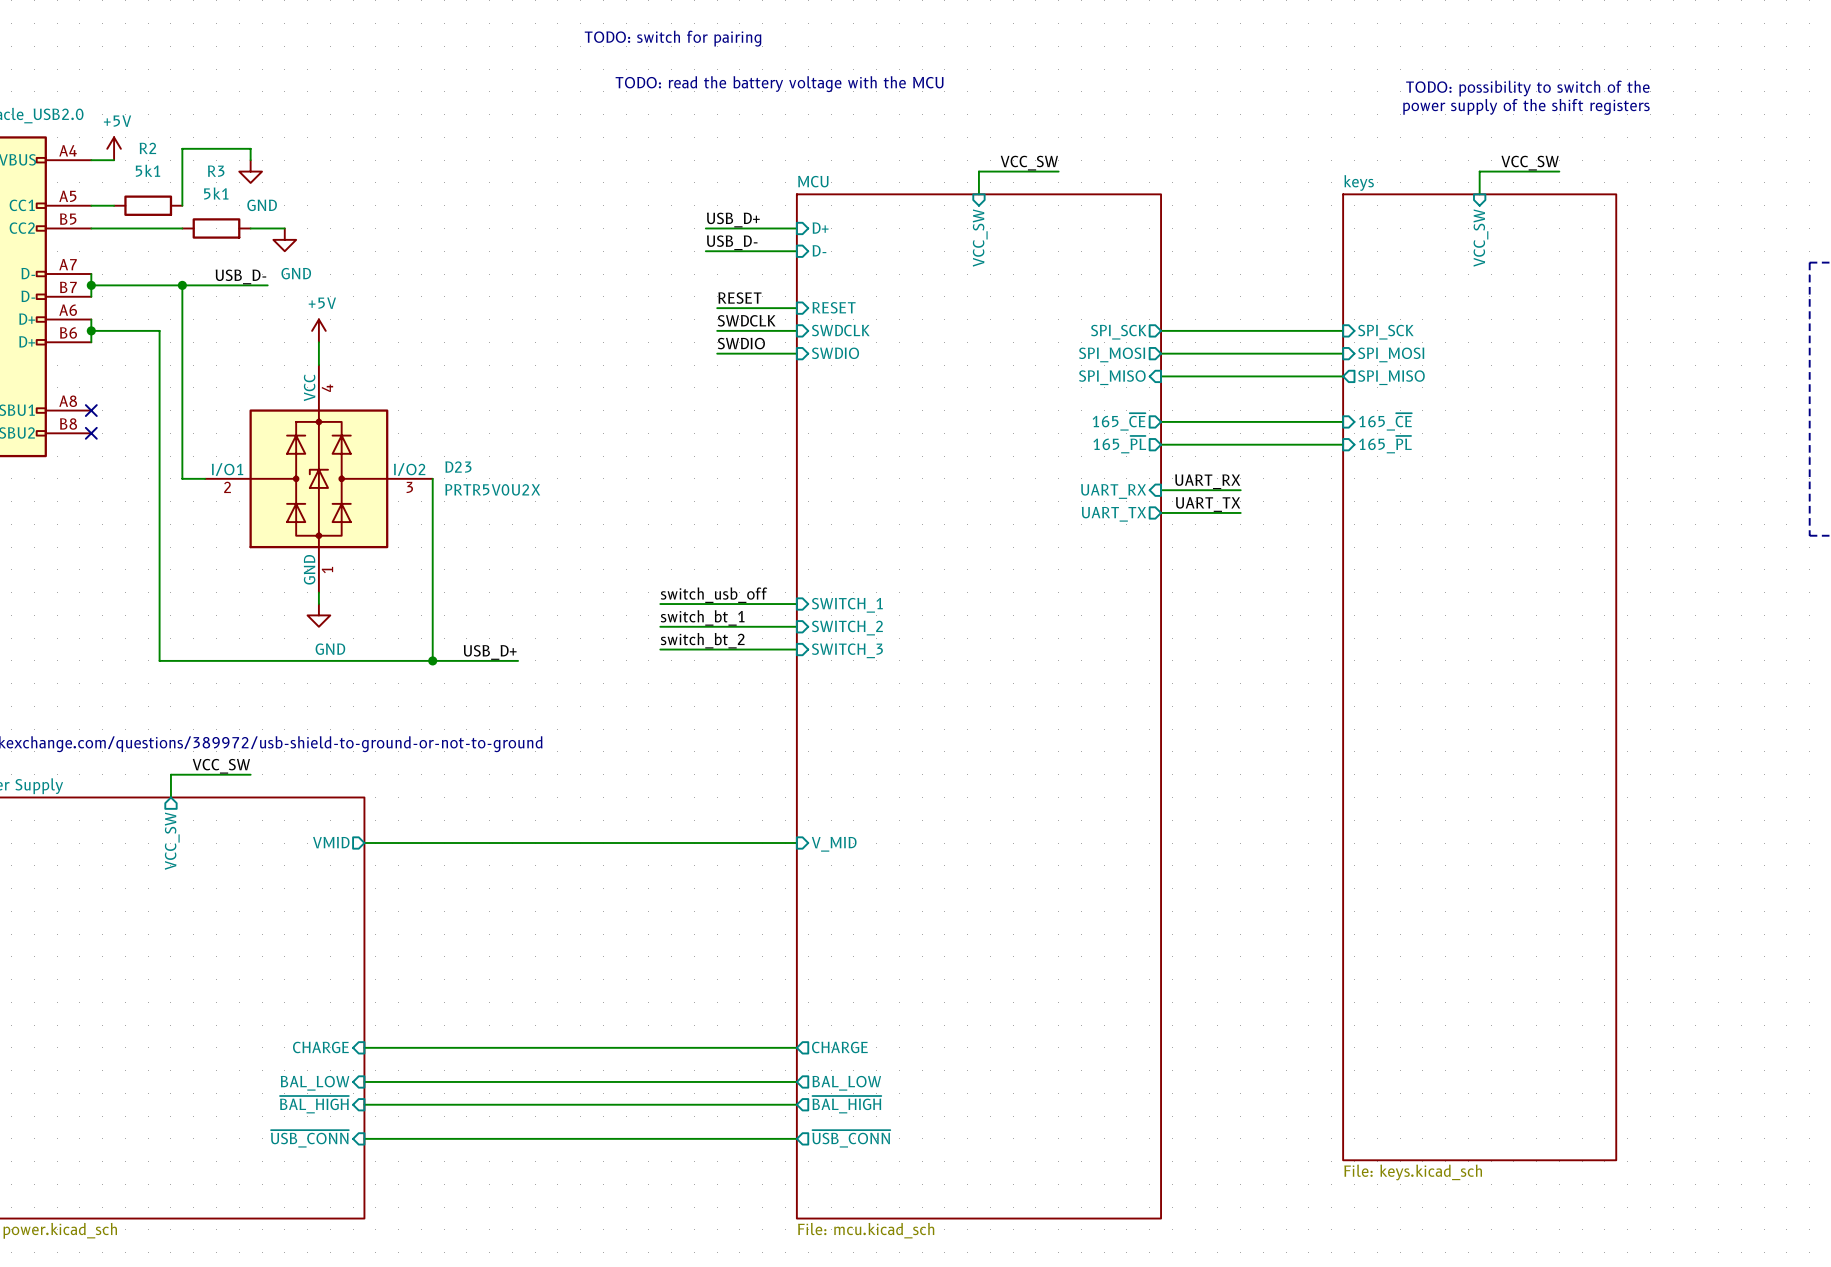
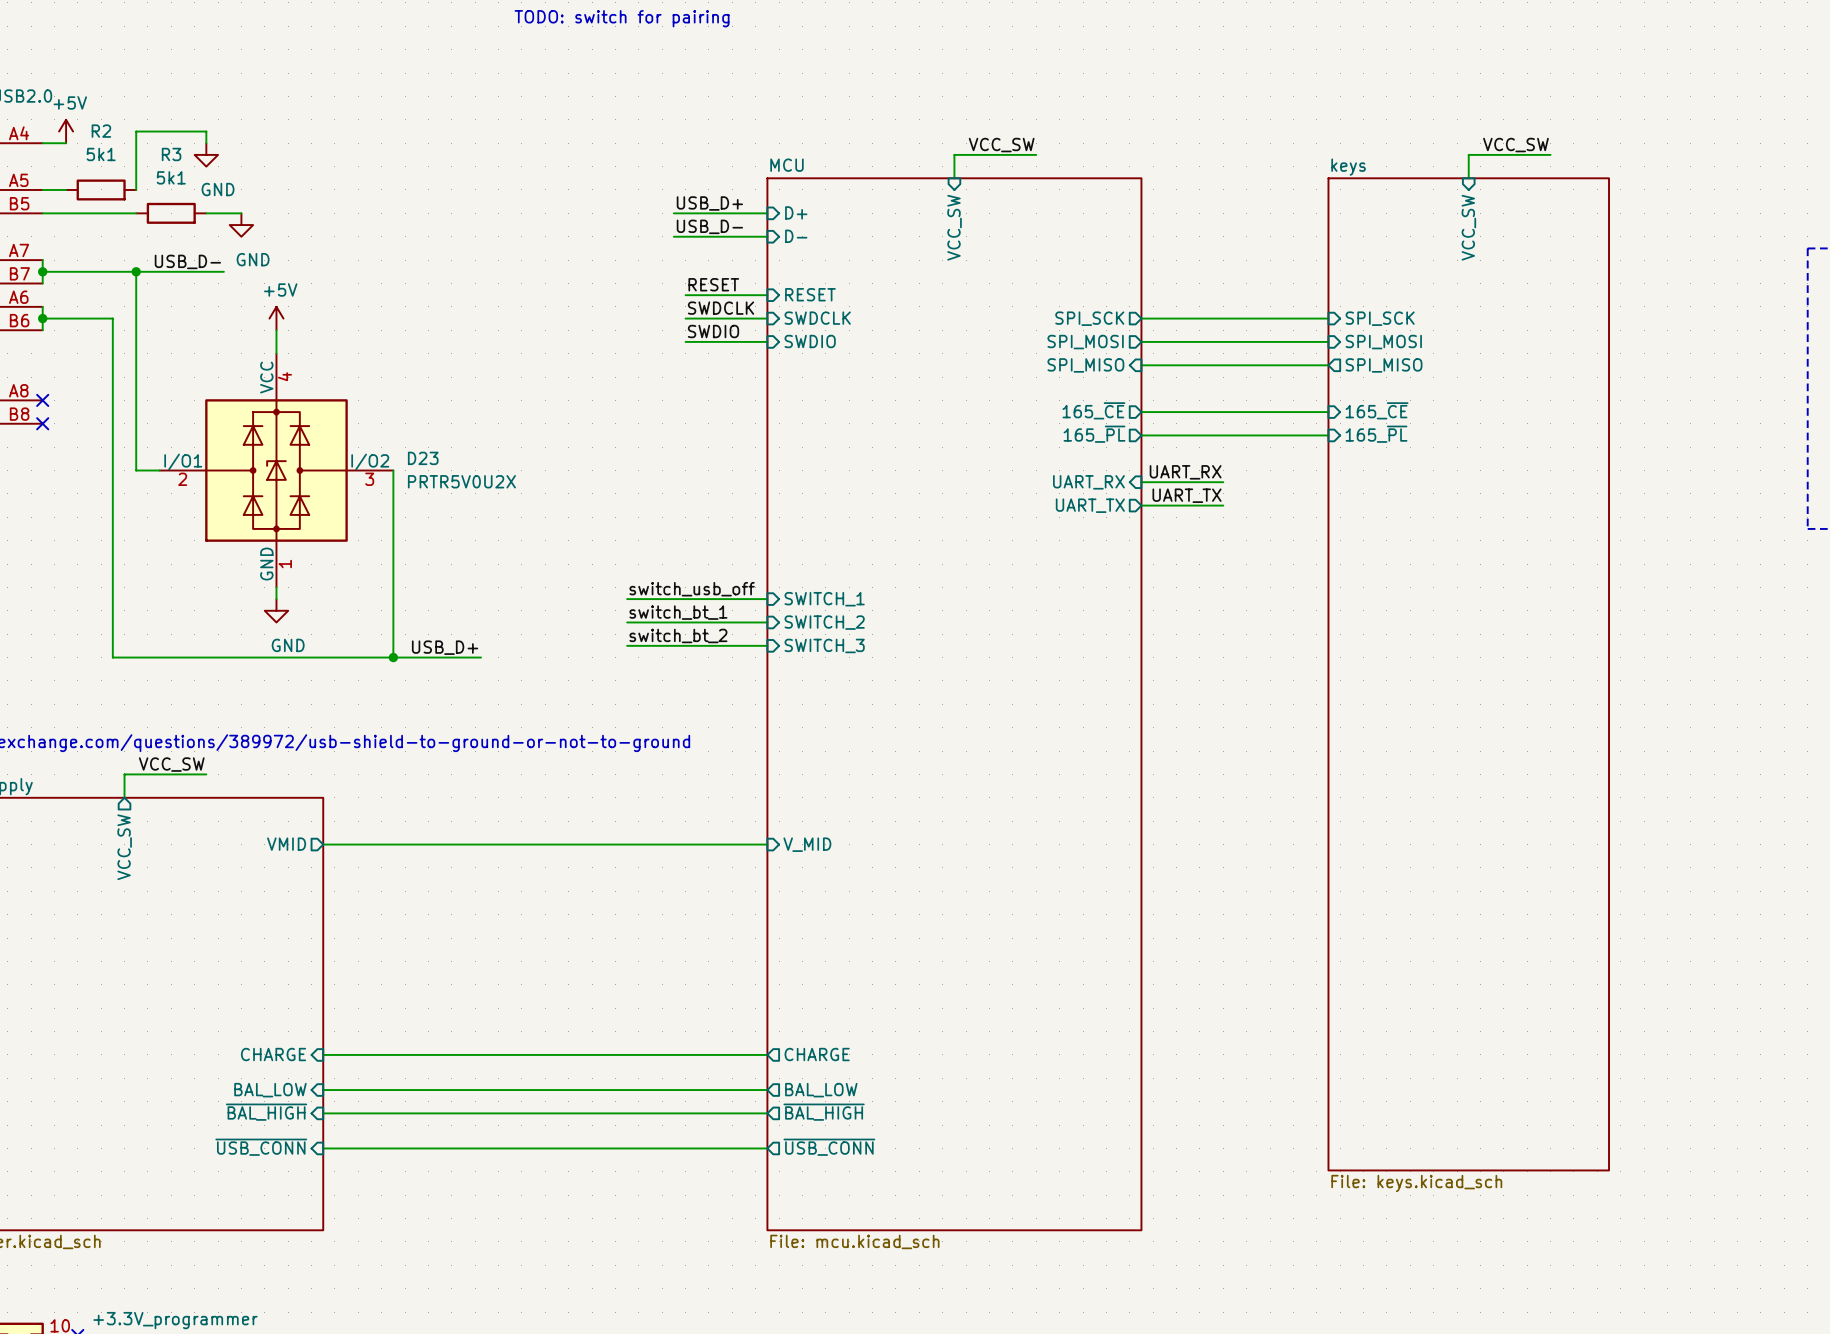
text: TODO: read the battery voltage with the MCU (779, 84) -> none
text: TODO: possibility to switch of the (1527, 88) -> none
text: power supply of the shift registers (1526, 106) -> none

